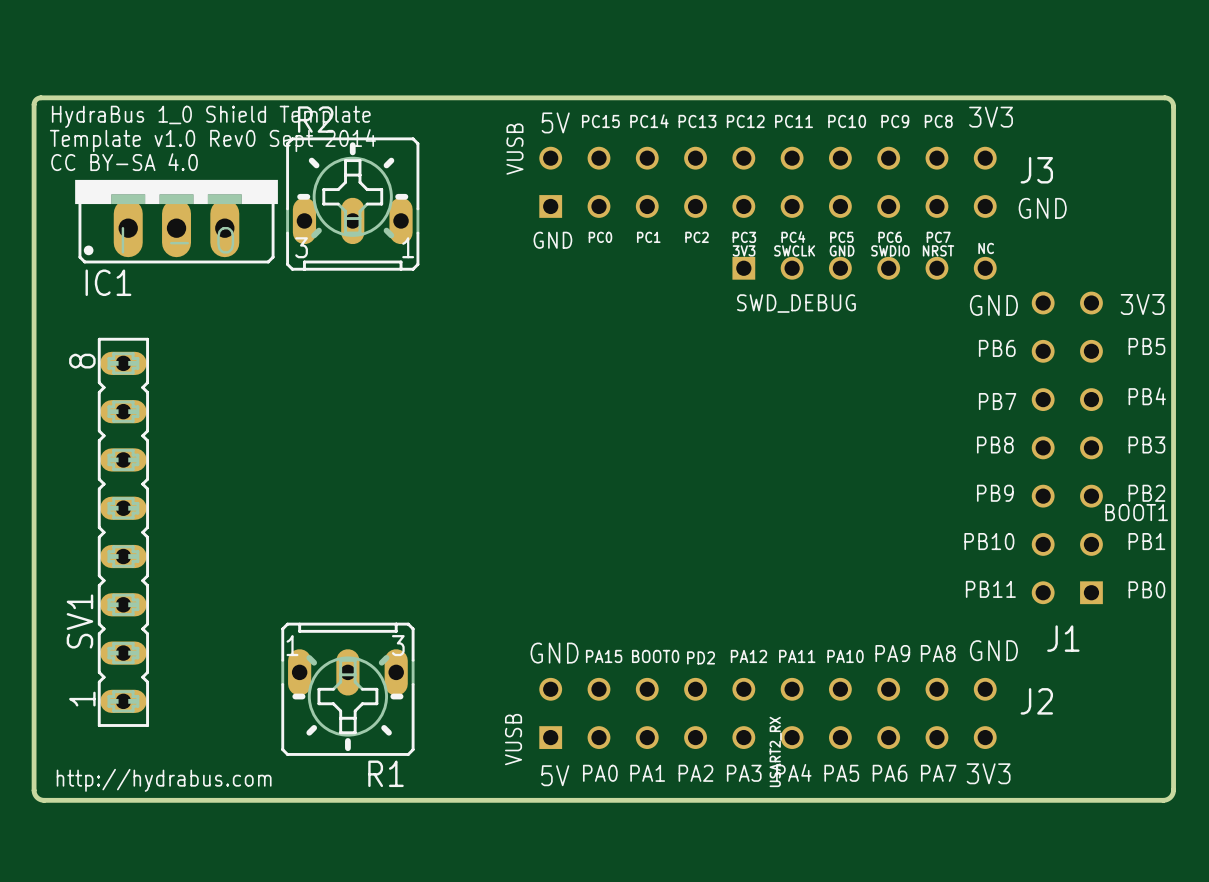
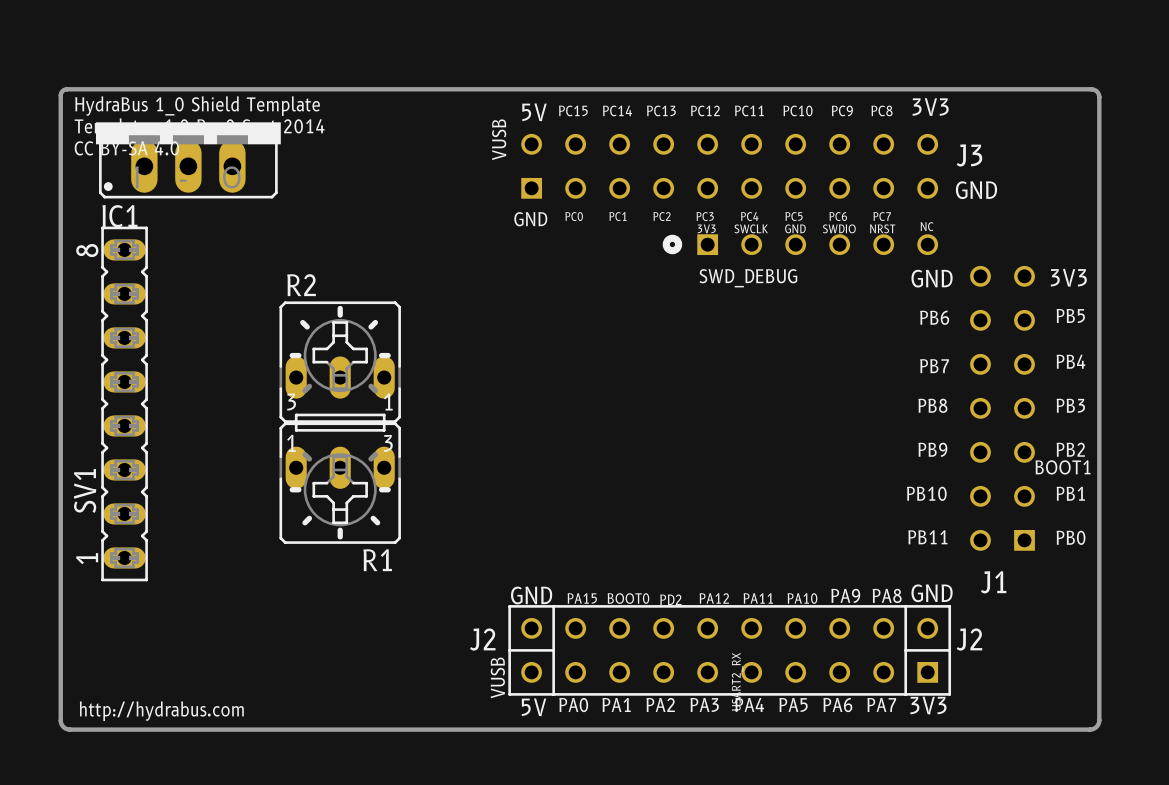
R2 position: (352, 204) -> (340, 362)
IC1 position: (176, 221) -> (188, 160)
drawing: none -> [662, 234, 683, 255]
SV1 position: (123, 532) -> (124, 403)
R1 position: (347, 689) -> (340, 483)
J2 side: top (767, 713) -> bottom (729, 650)

